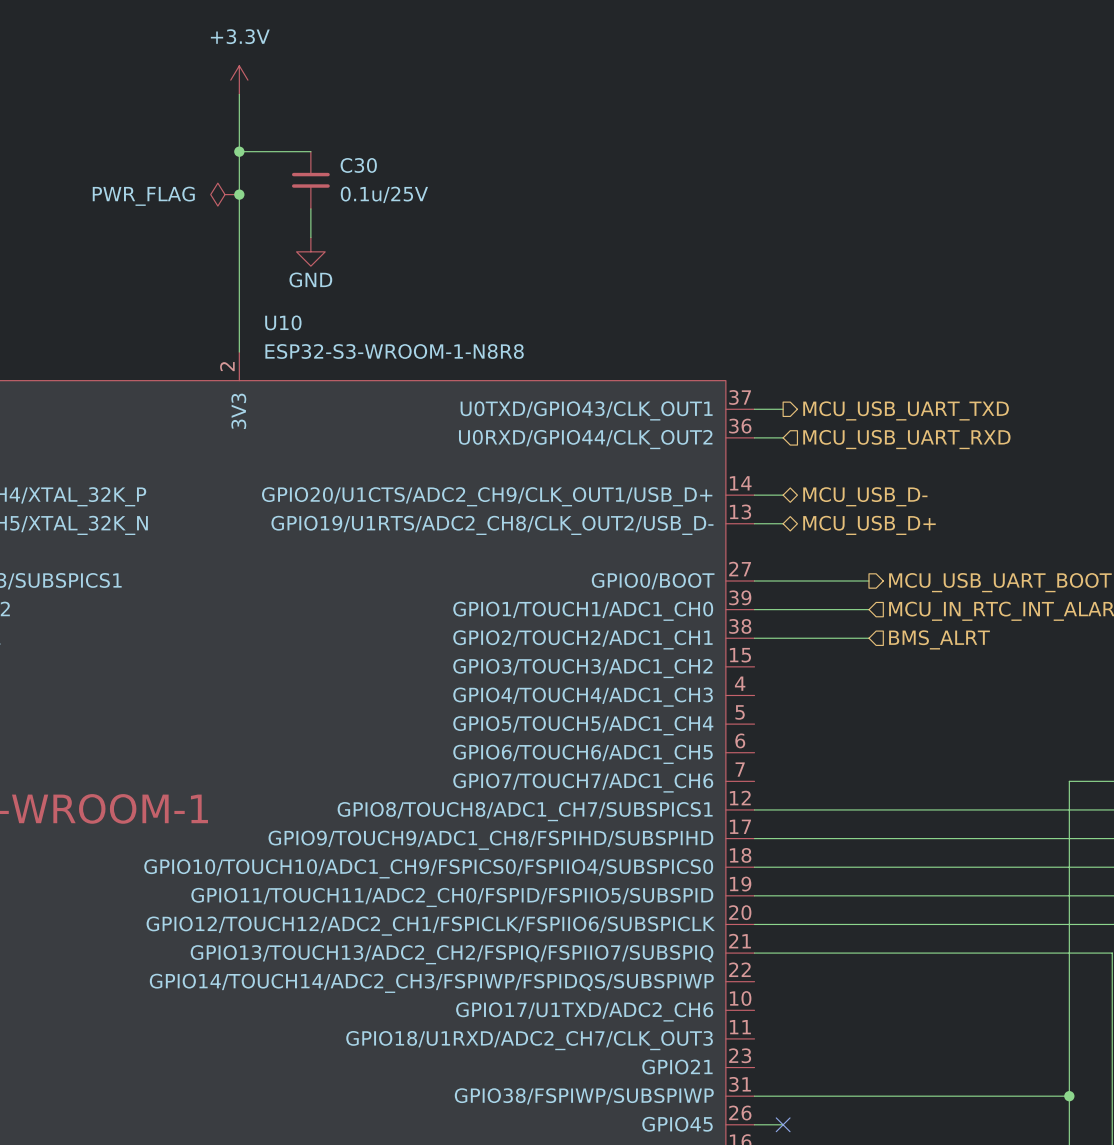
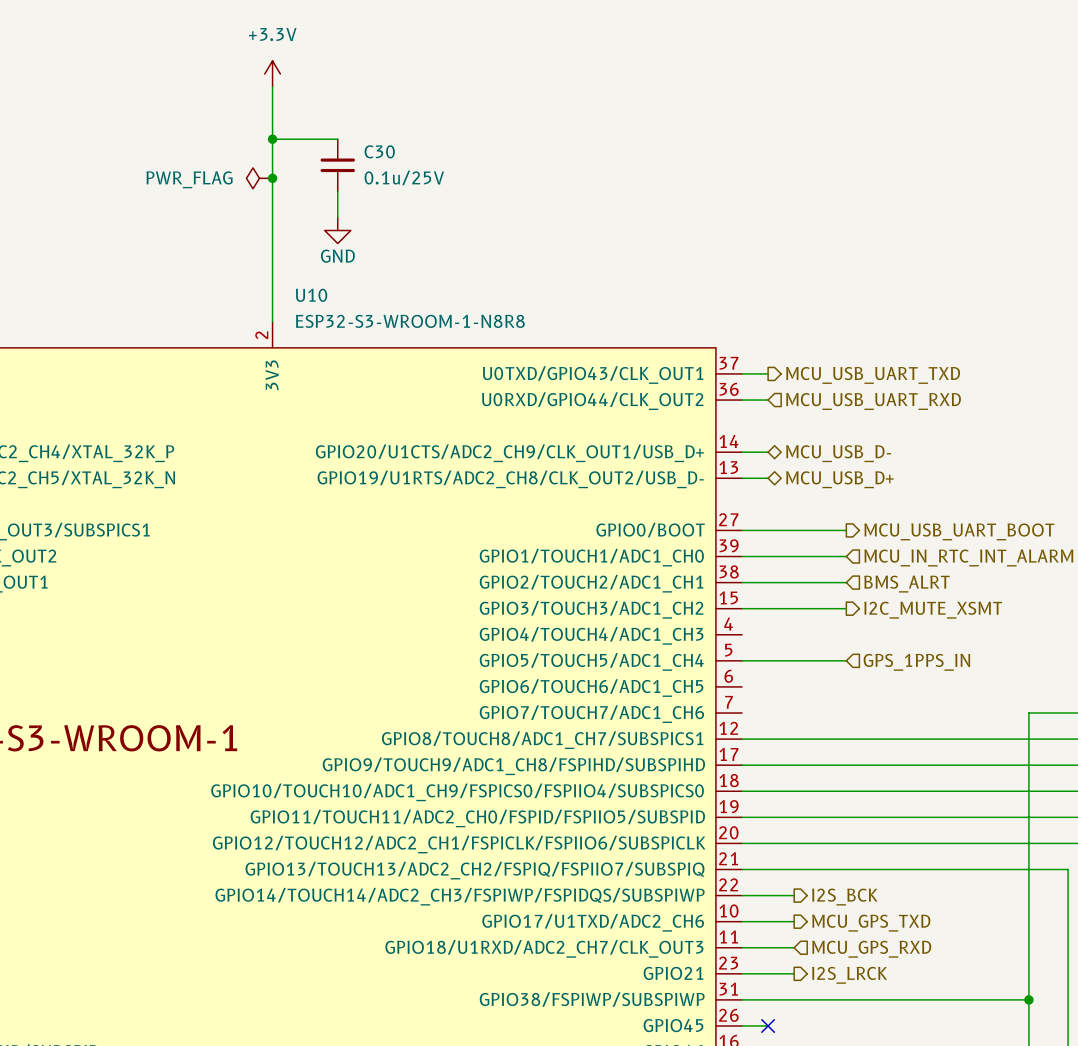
wire: none -> (742, 608) (846, 608)
hierarchical label: none -> I2C_MUTE_XSMT (933, 610)
wire: none -> (742, 660) (846, 660)
hierarchical label: none -> GPS_1PPS_IN (916, 662)
wire: none -> (742, 895) (794, 895)
hierarchical label: none -> I2S_BCK (844, 897)
wire: none -> (742, 921) (794, 921)
hierarchical label: none -> MCU_GPS_TXD (871, 923)
wire: none -> (742, 947) (794, 947)
hierarchical label: none -> MCU_GPS_RXD (871, 949)
wire: none -> (742, 973) (794, 973)
hierarchical label: none -> I2S_LRCK (849, 975)

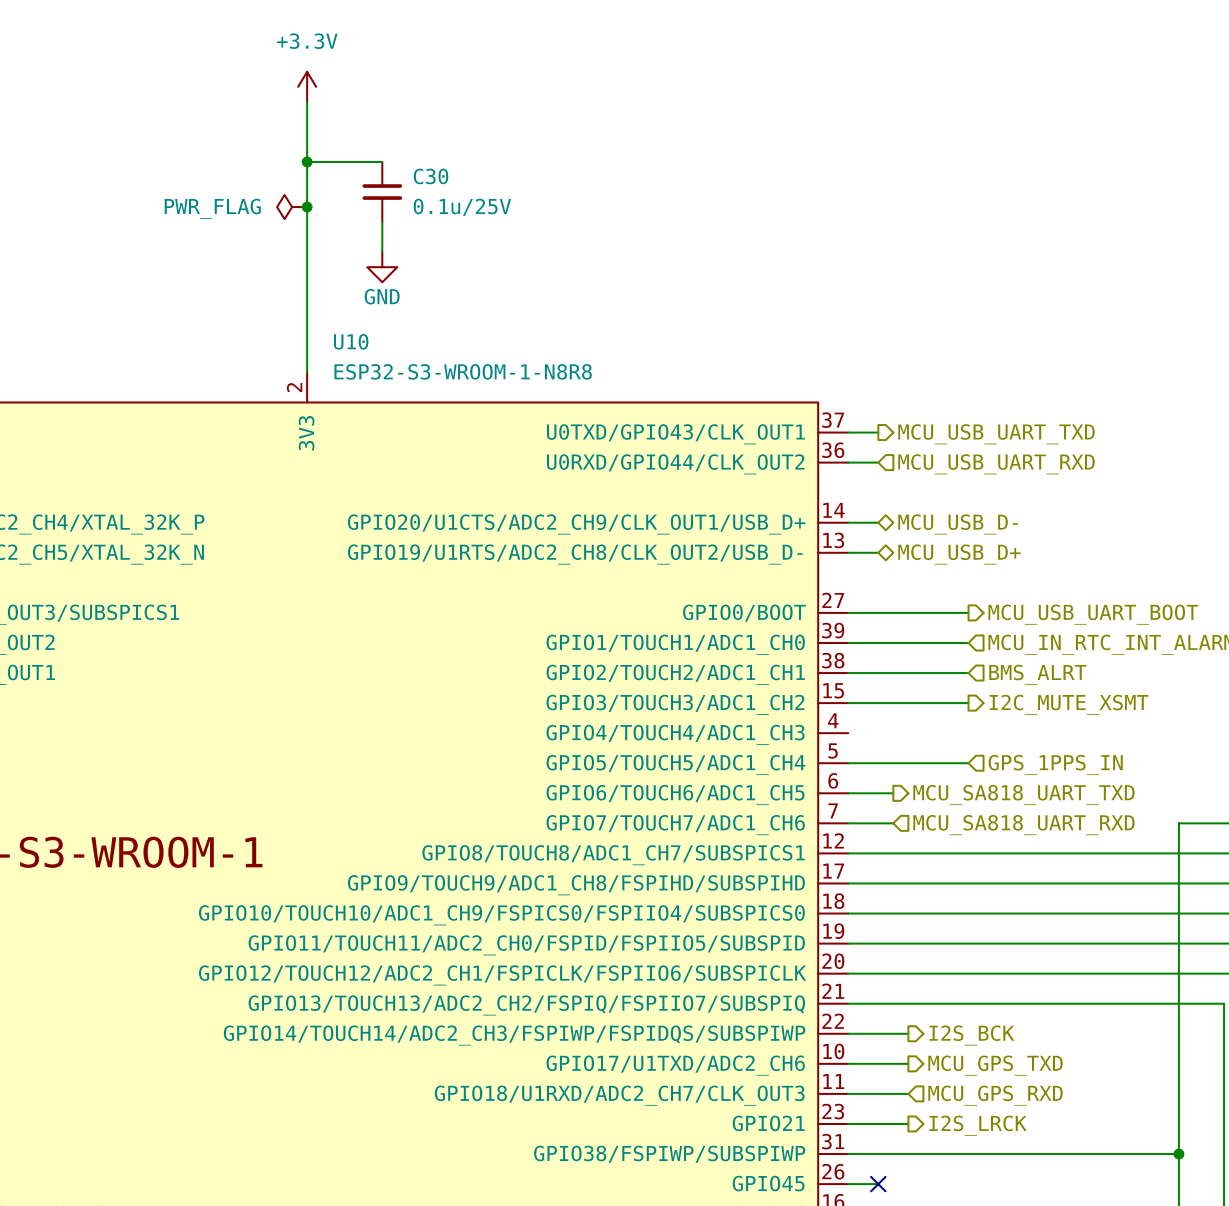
wire: none -> (848, 793) (893, 793)
hierarchical label: none -> MCU_SA818_UART_TXD (1023, 795)
wire: none -> (848, 823) (893, 823)
hierarchical label: none -> MCU_SA818_UART_RXD (1023, 825)

